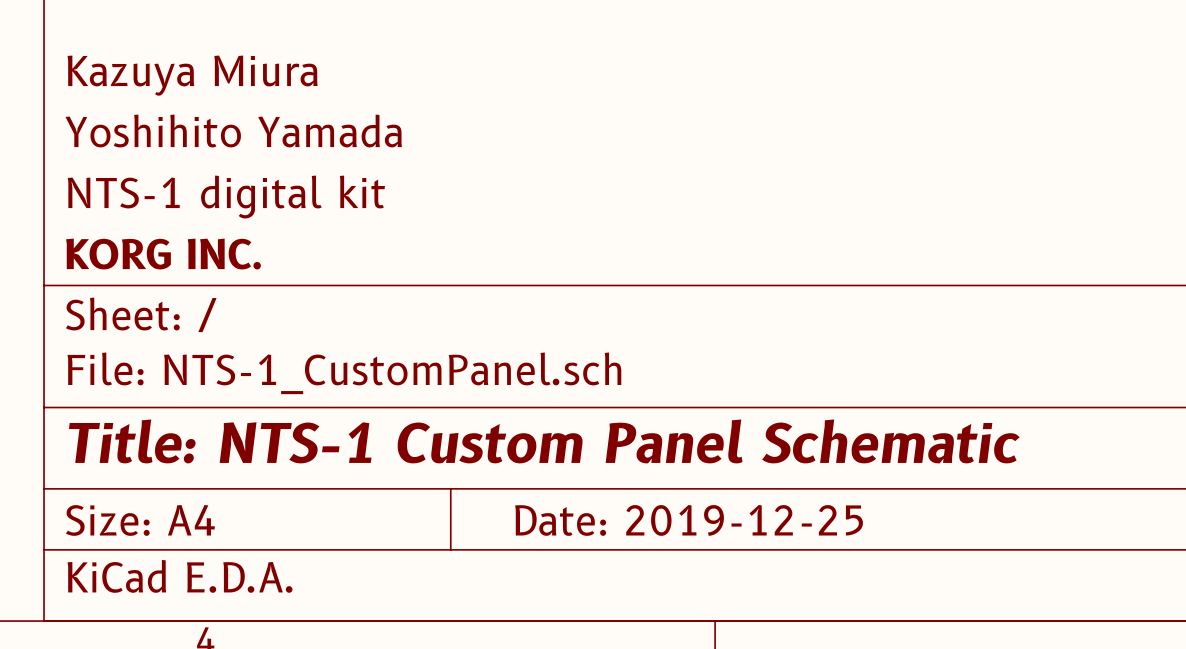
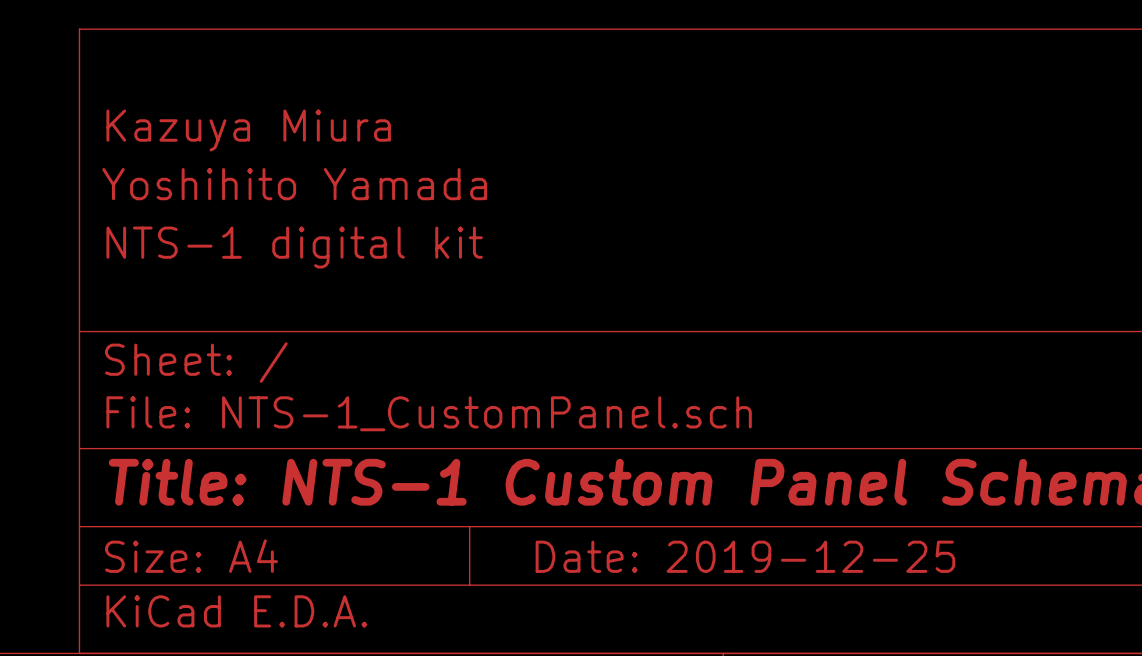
title block: KORG INC. (163, 254) -> none

